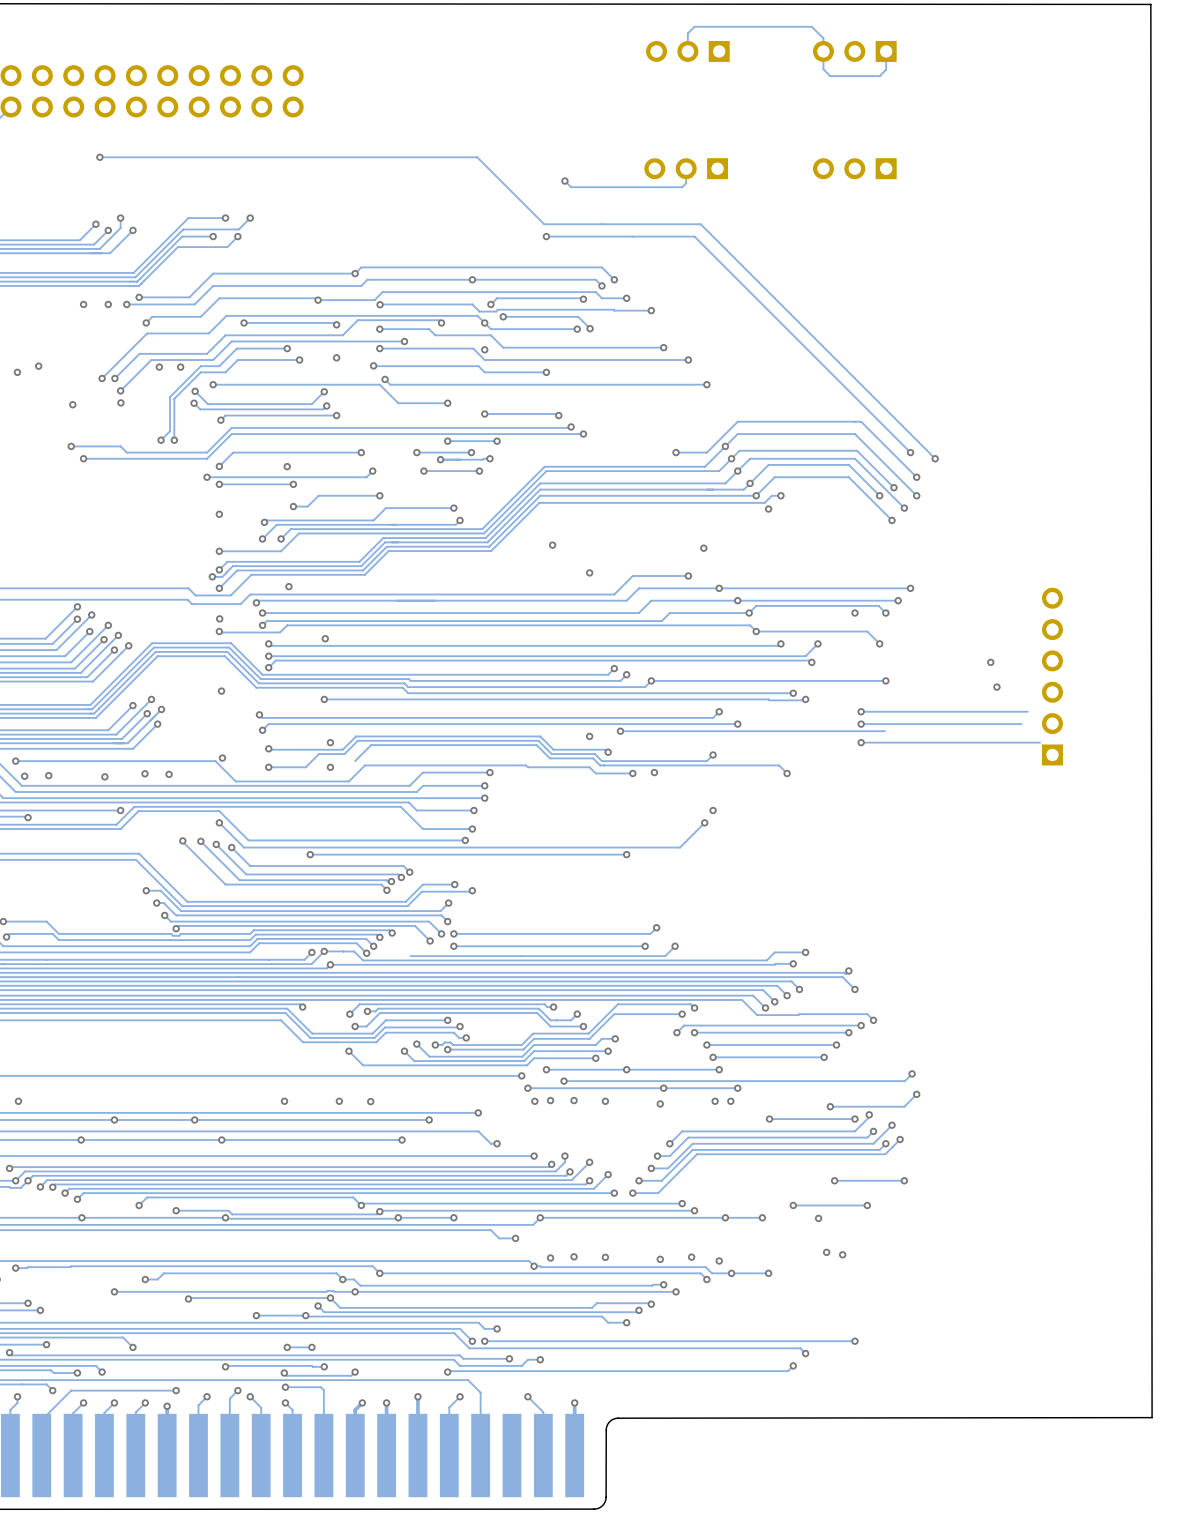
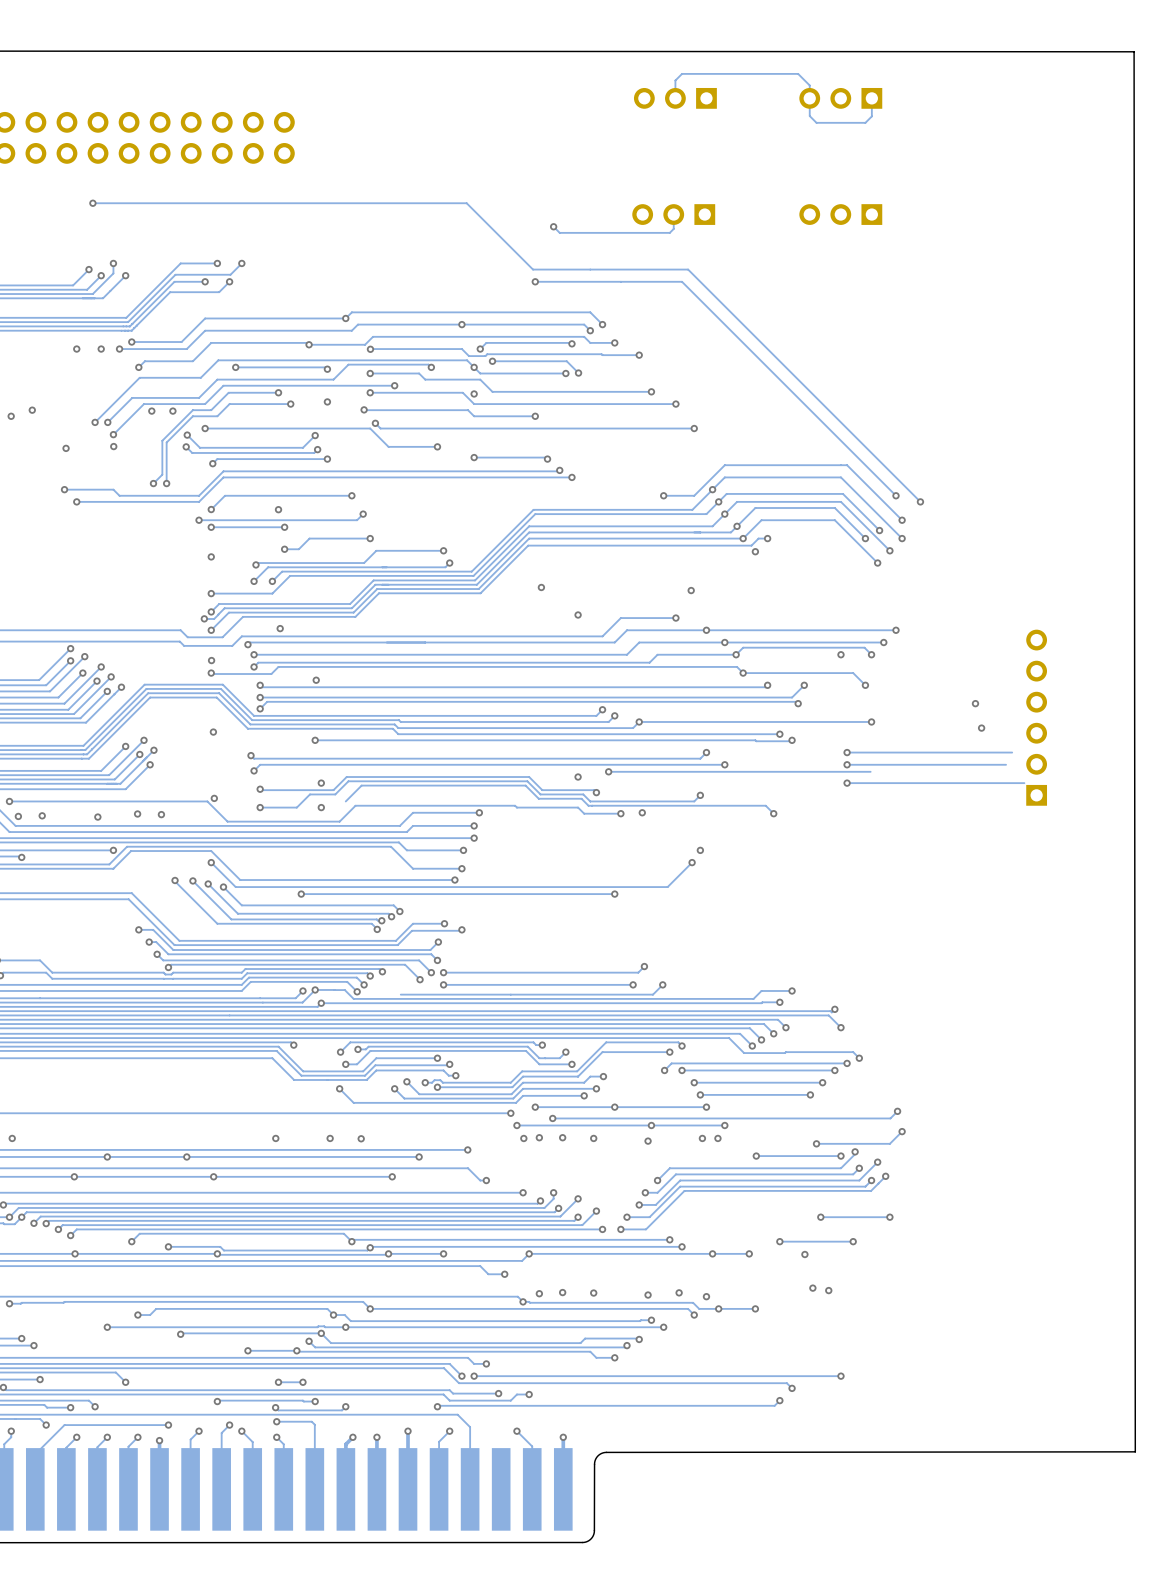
via: (447, 441) -> none
track: (497, 441) (447, 441) -> none
via: (497, 441) -> none
via: (416, 452) -> none
track: (471, 452) (416, 452) -> none
via: (471, 452) -> none
track: (489, 458) (440, 459) -> none
via: (489, 458) -> none
via: (440, 459) -> none
via: (423, 471) -> none
track: (478, 471) (423, 471) -> none
via: (479, 471) -> none

